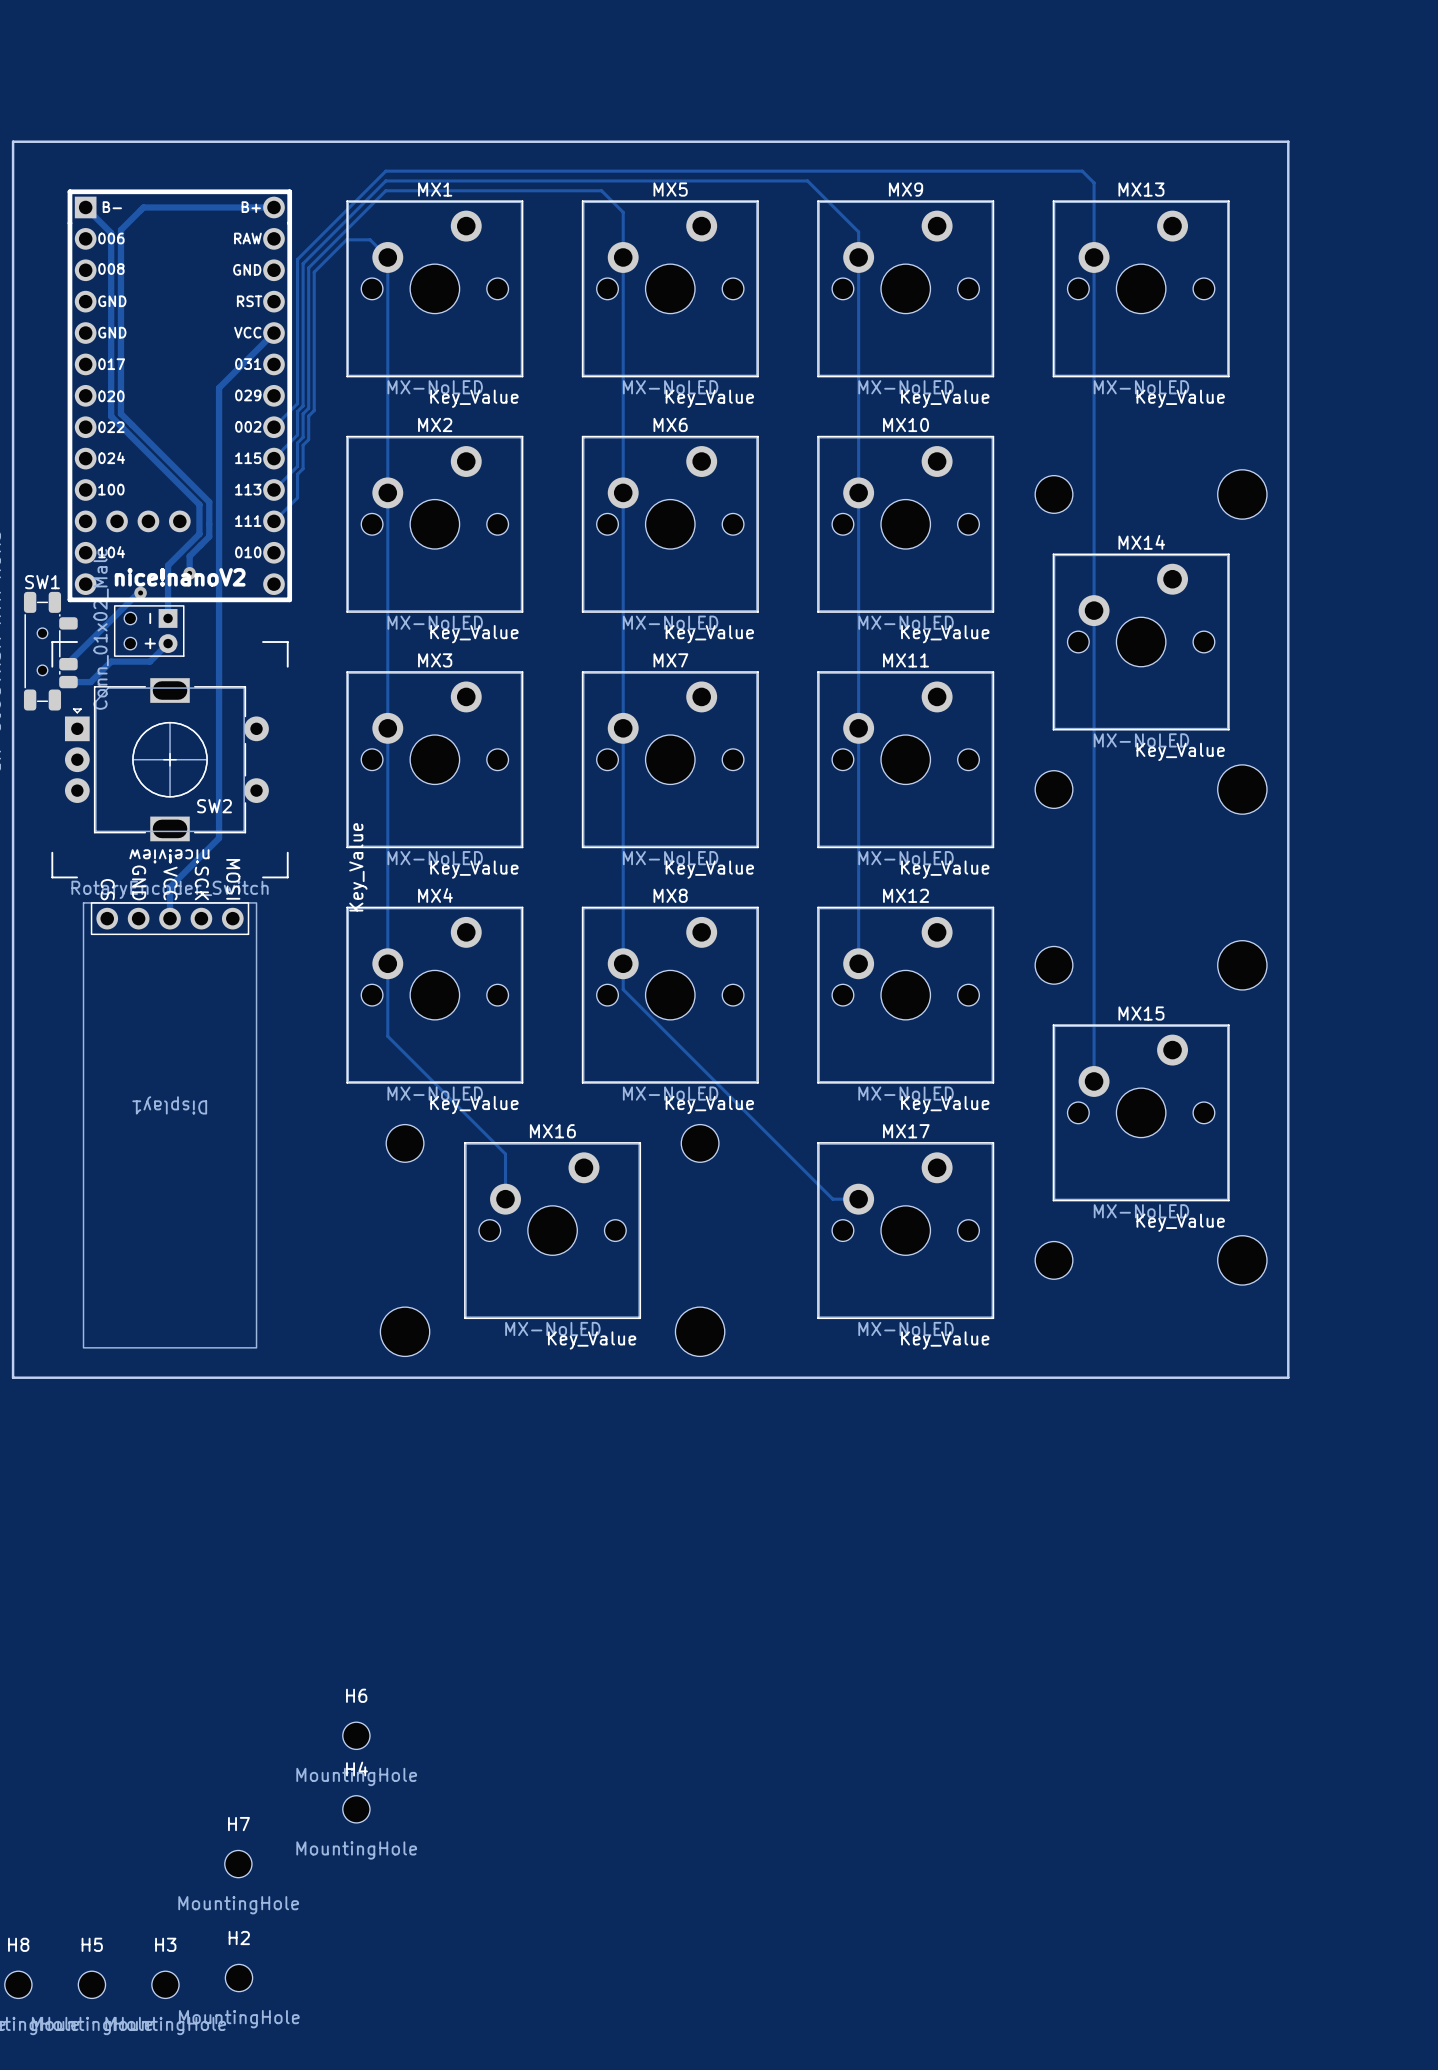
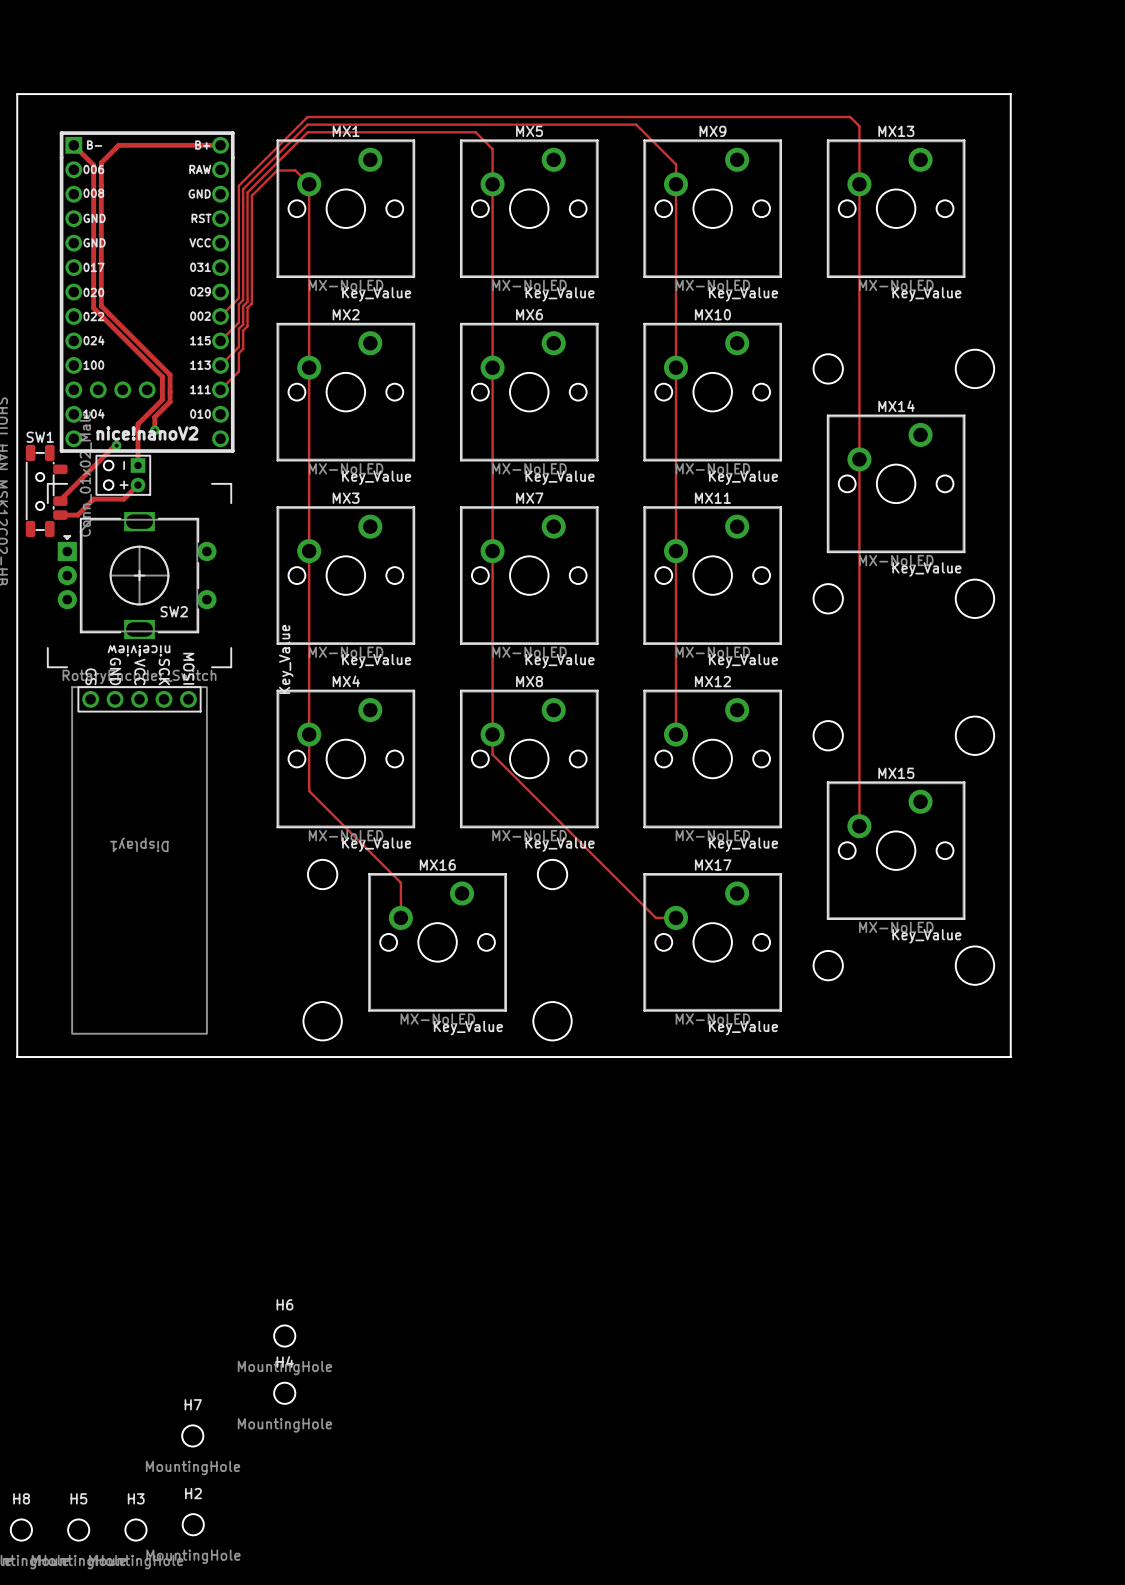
track: (274, 333) (219, 387) (219, 838) (170, 887) (170, 918) -> none

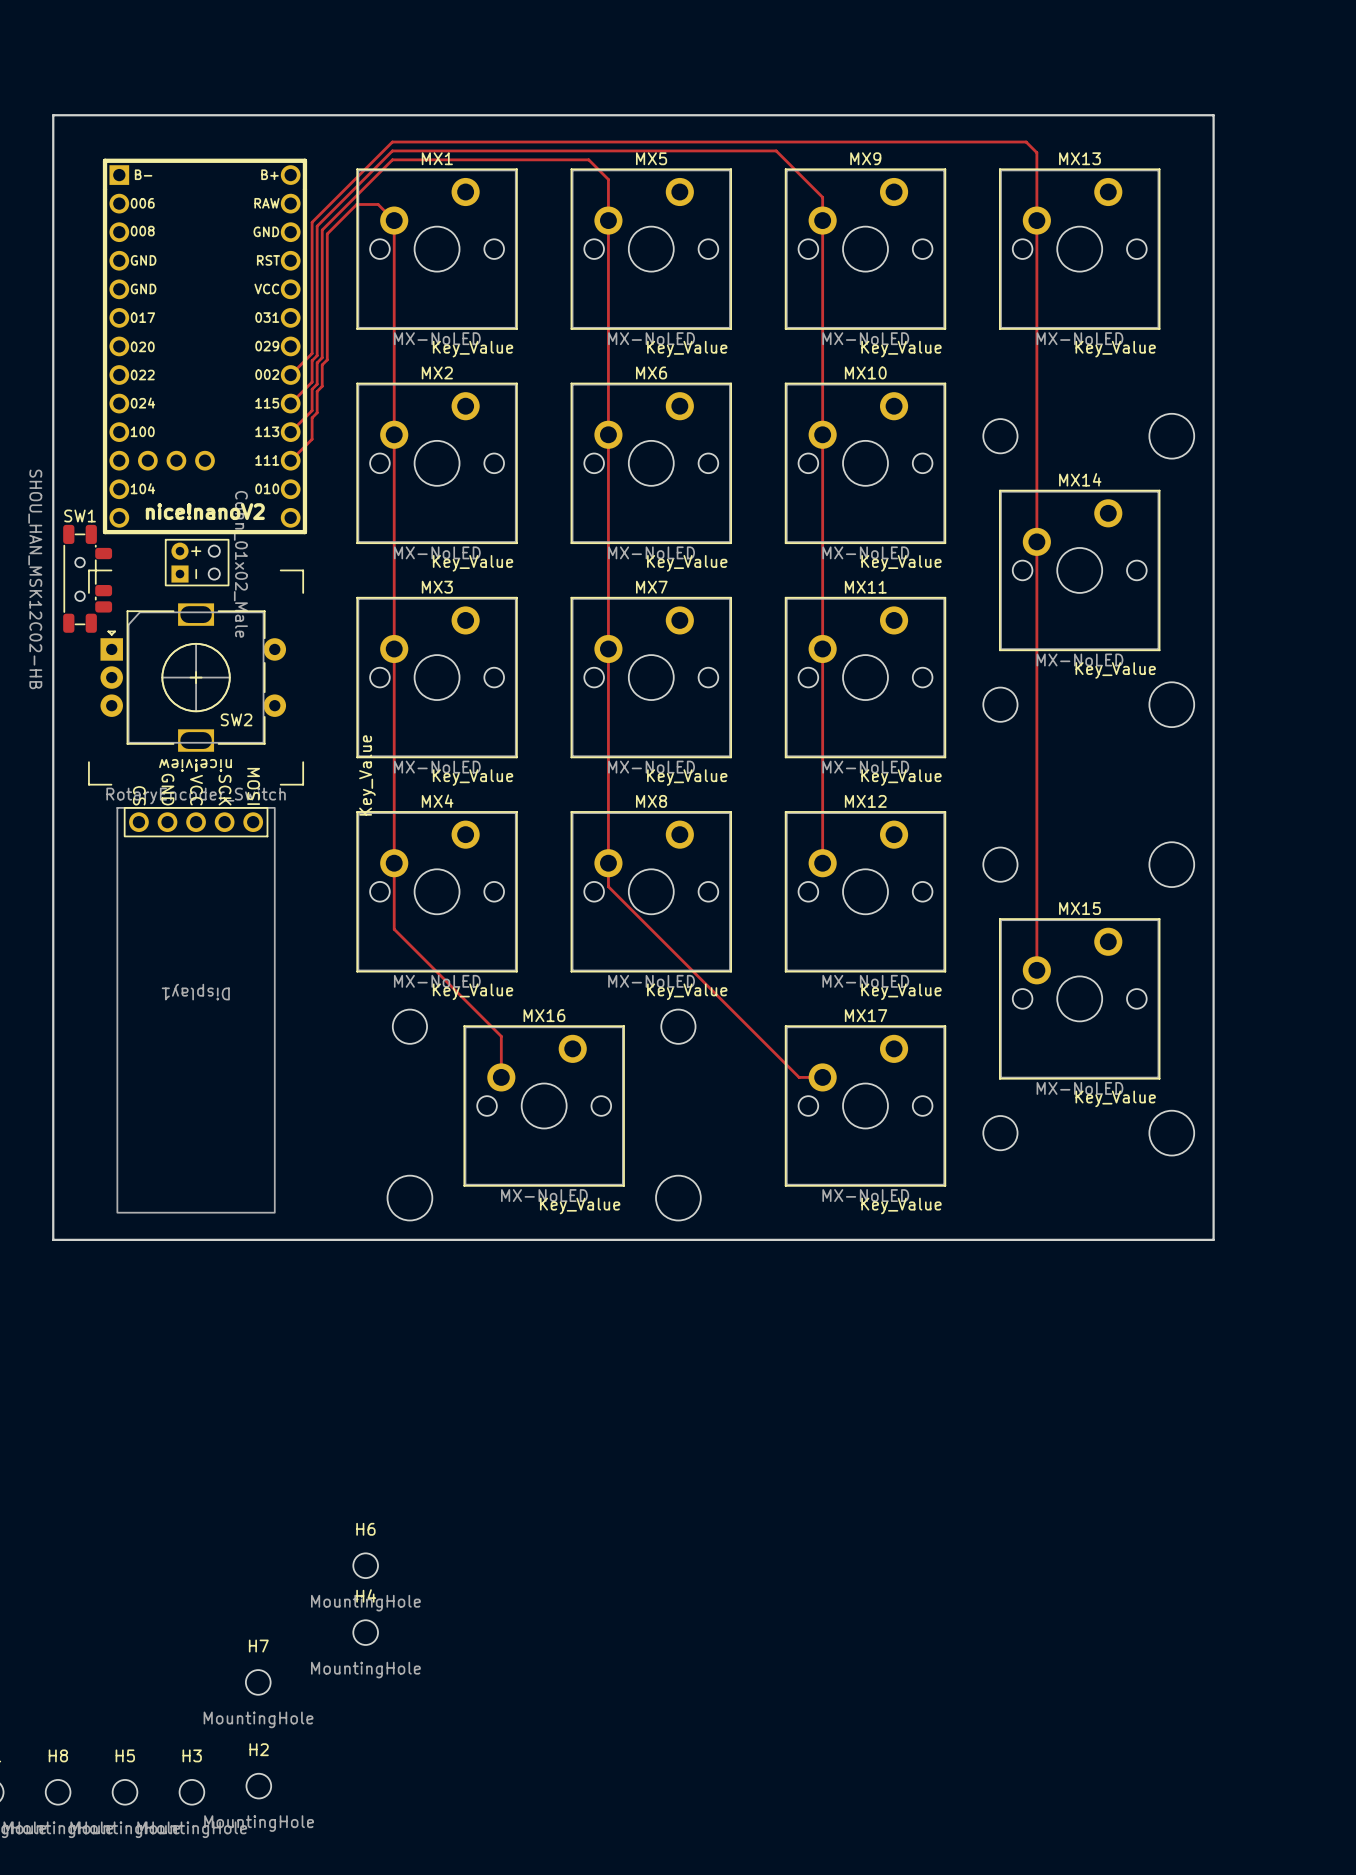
track: (73, 145) (93, 165) (93, 308) (162, 376) (162, 399) (137, 424) (137, 465) -> none
track: (220, 145) (118, 145) (101, 162) (101, 306) (170, 374) (170, 401) (154, 417) (154, 430) -> none
via: (154, 430) -> none
track: (116, 445) (60, 501) -> none
via: (116, 445) -> none
part rotation: 0° (123, 475) -> 180° (197, 562)
track: (137, 485) (123, 499) (93, 499) (77, 515) (60, 515) -> none

